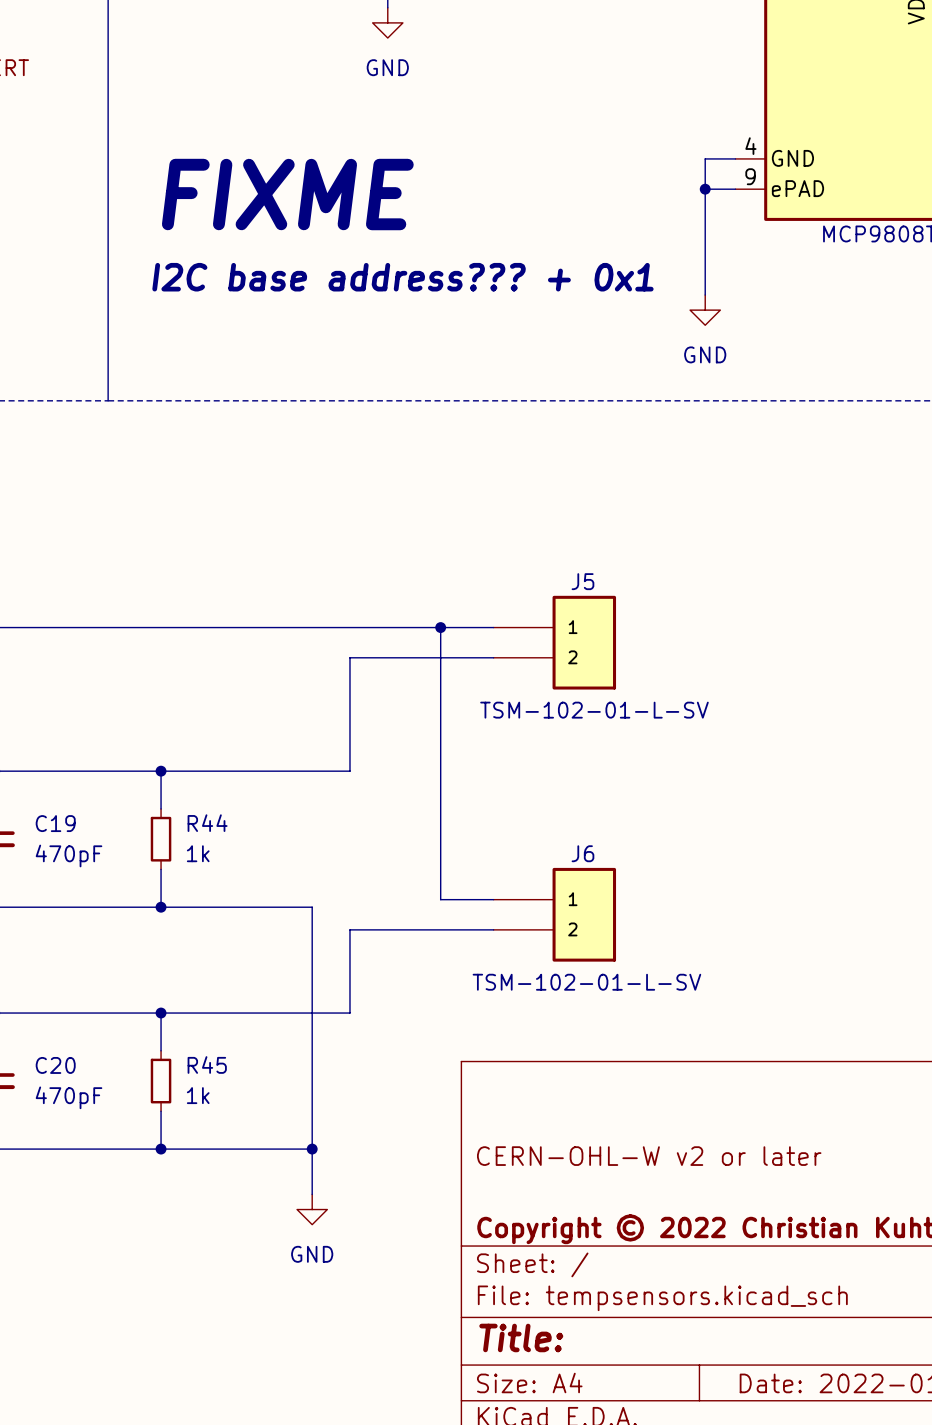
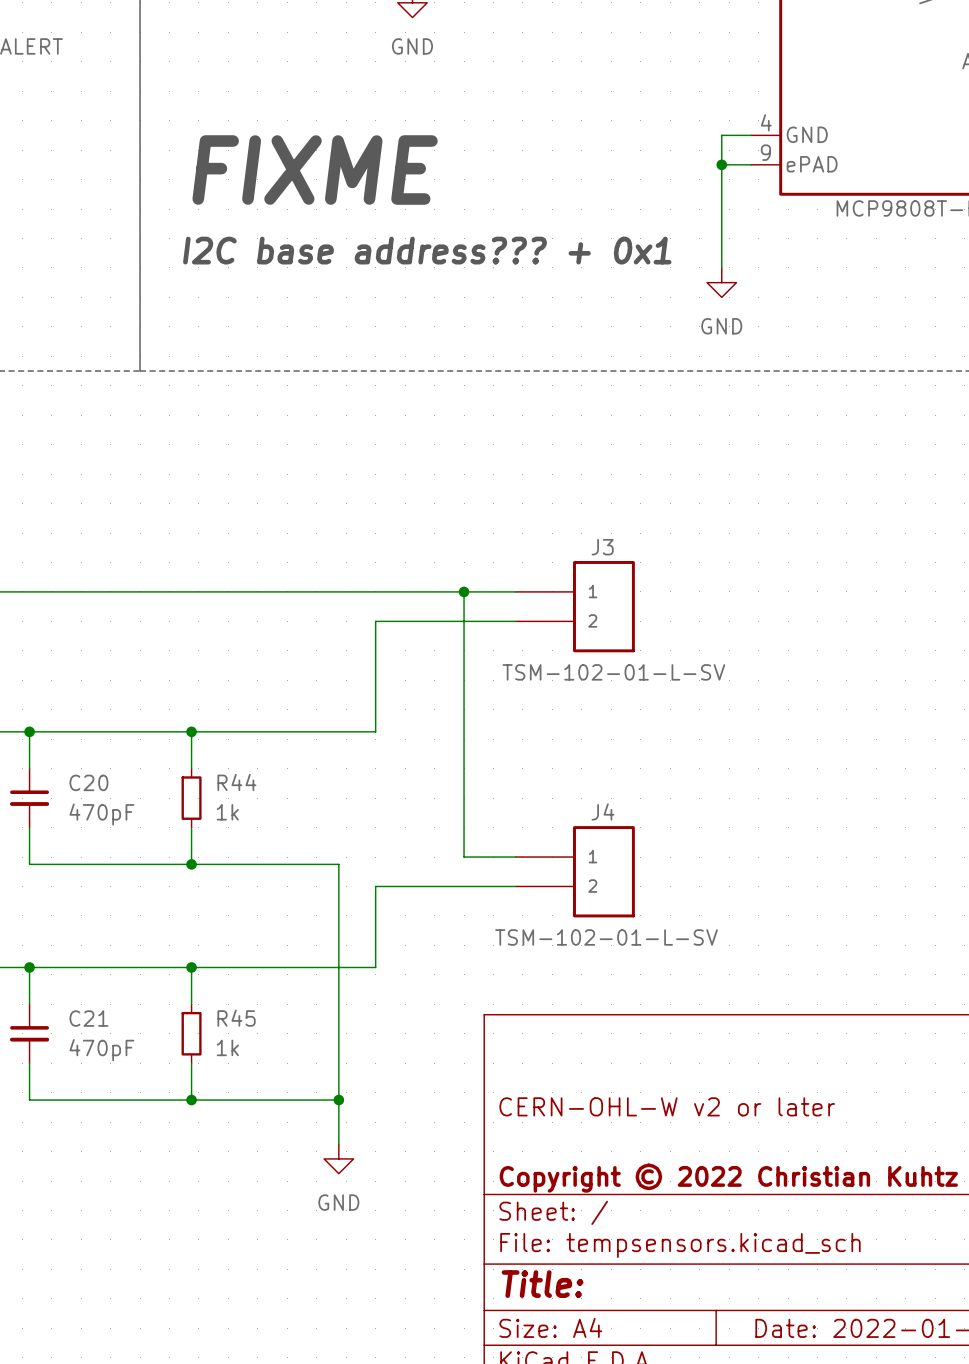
J5 name: J5 (582, 581) -> J3 (602, 547)
C19 name: C19 (55, 823) -> C20 (88, 782)
J6 name: J6 (582, 853) -> J4 (603, 811)
C20 name: C20 (55, 1065) -> C21 (88, 1018)

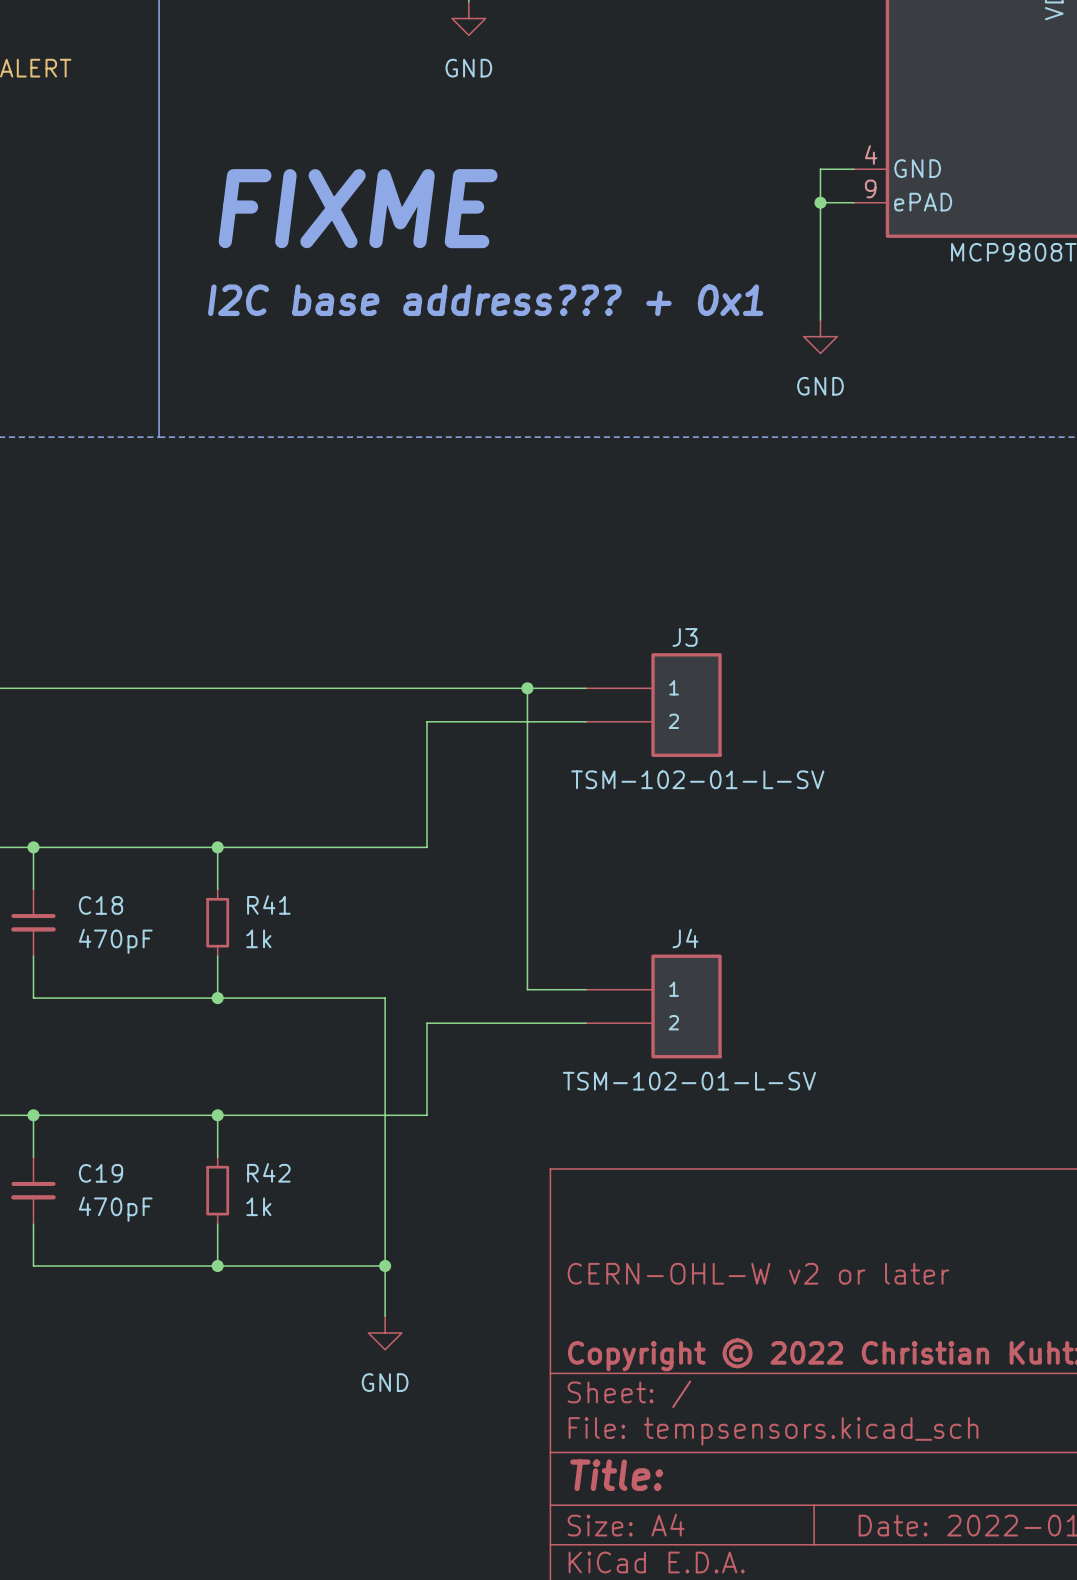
C20 name: C20 (88, 782) -> C18 (100, 905)
R44 name: R44 (236, 782) -> R41 (268, 904)
C21 name: C21 (88, 1018) -> C19 (100, 1173)
R45 name: R45 (236, 1018) -> R42 (268, 1172)

